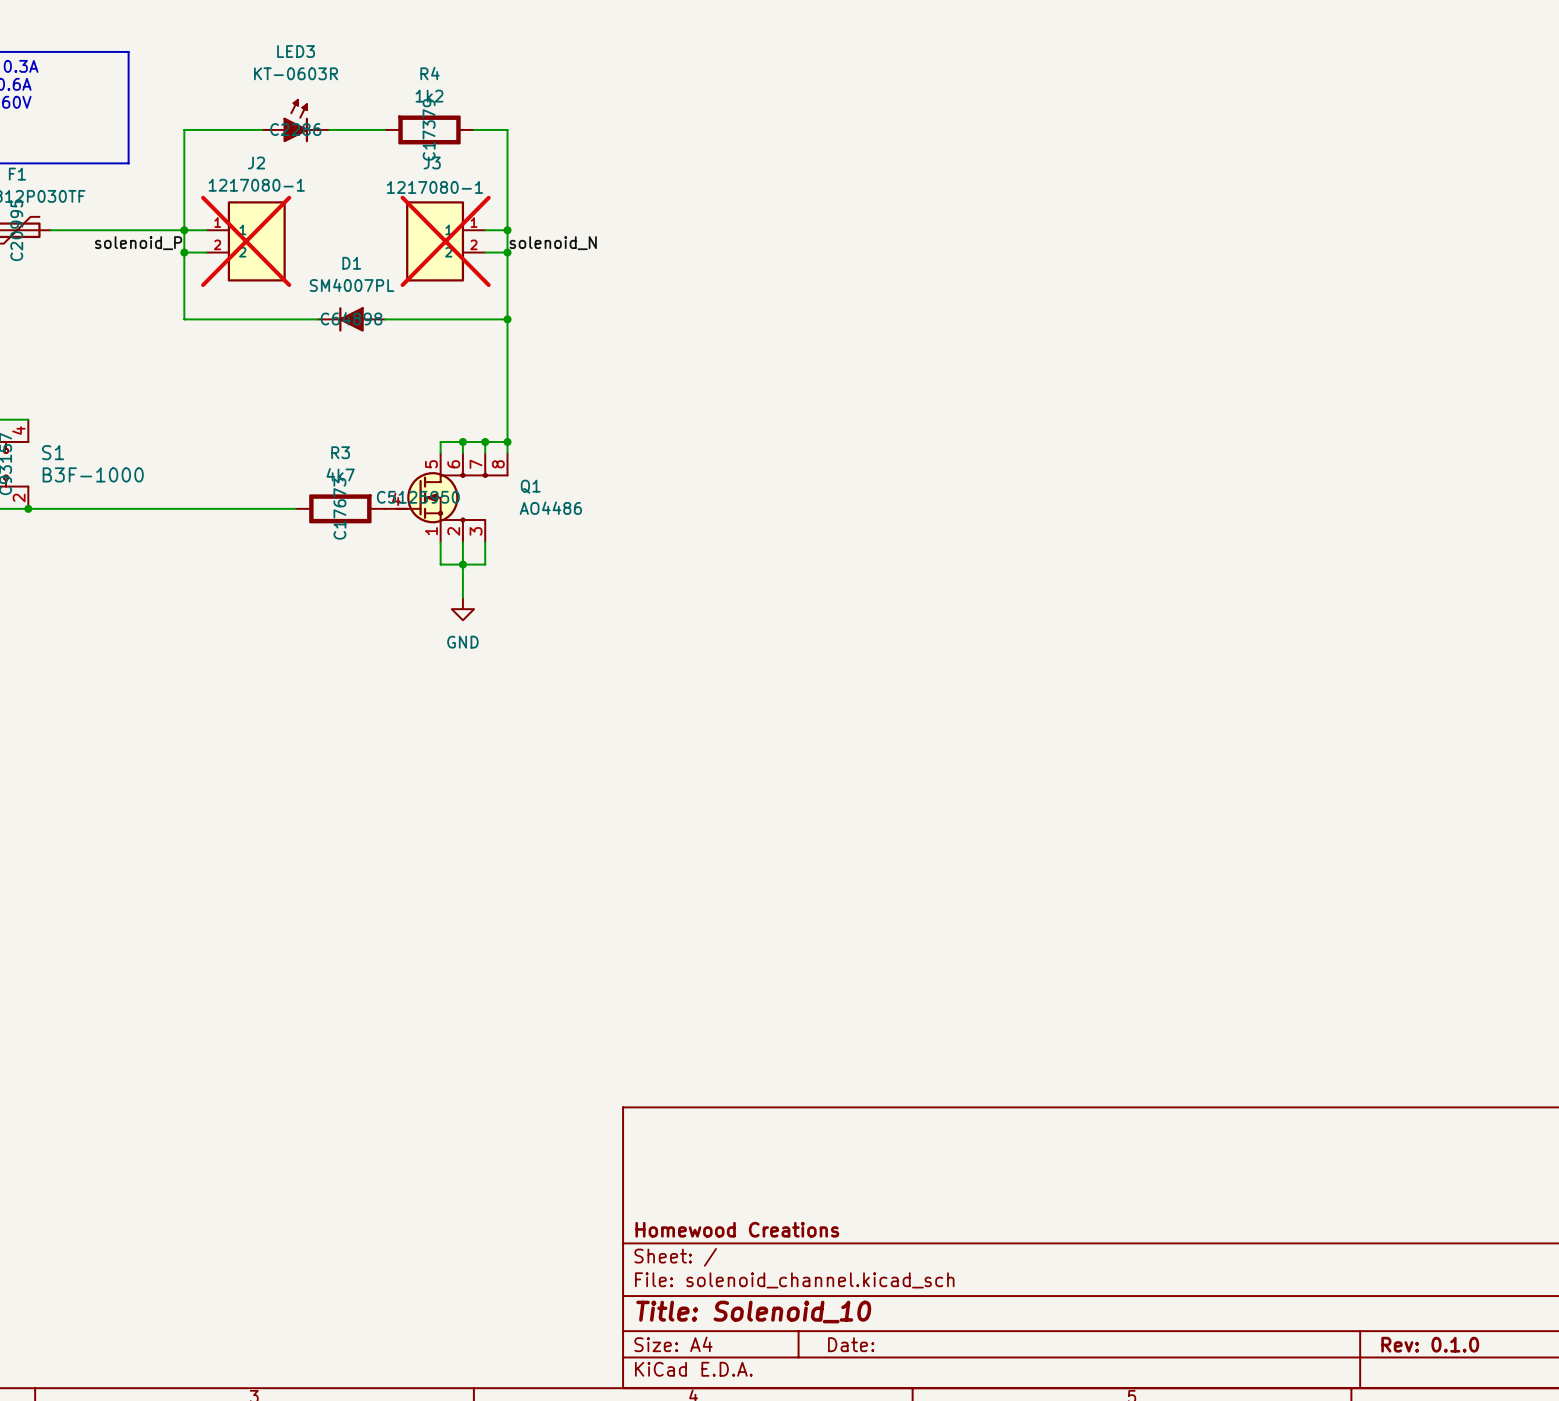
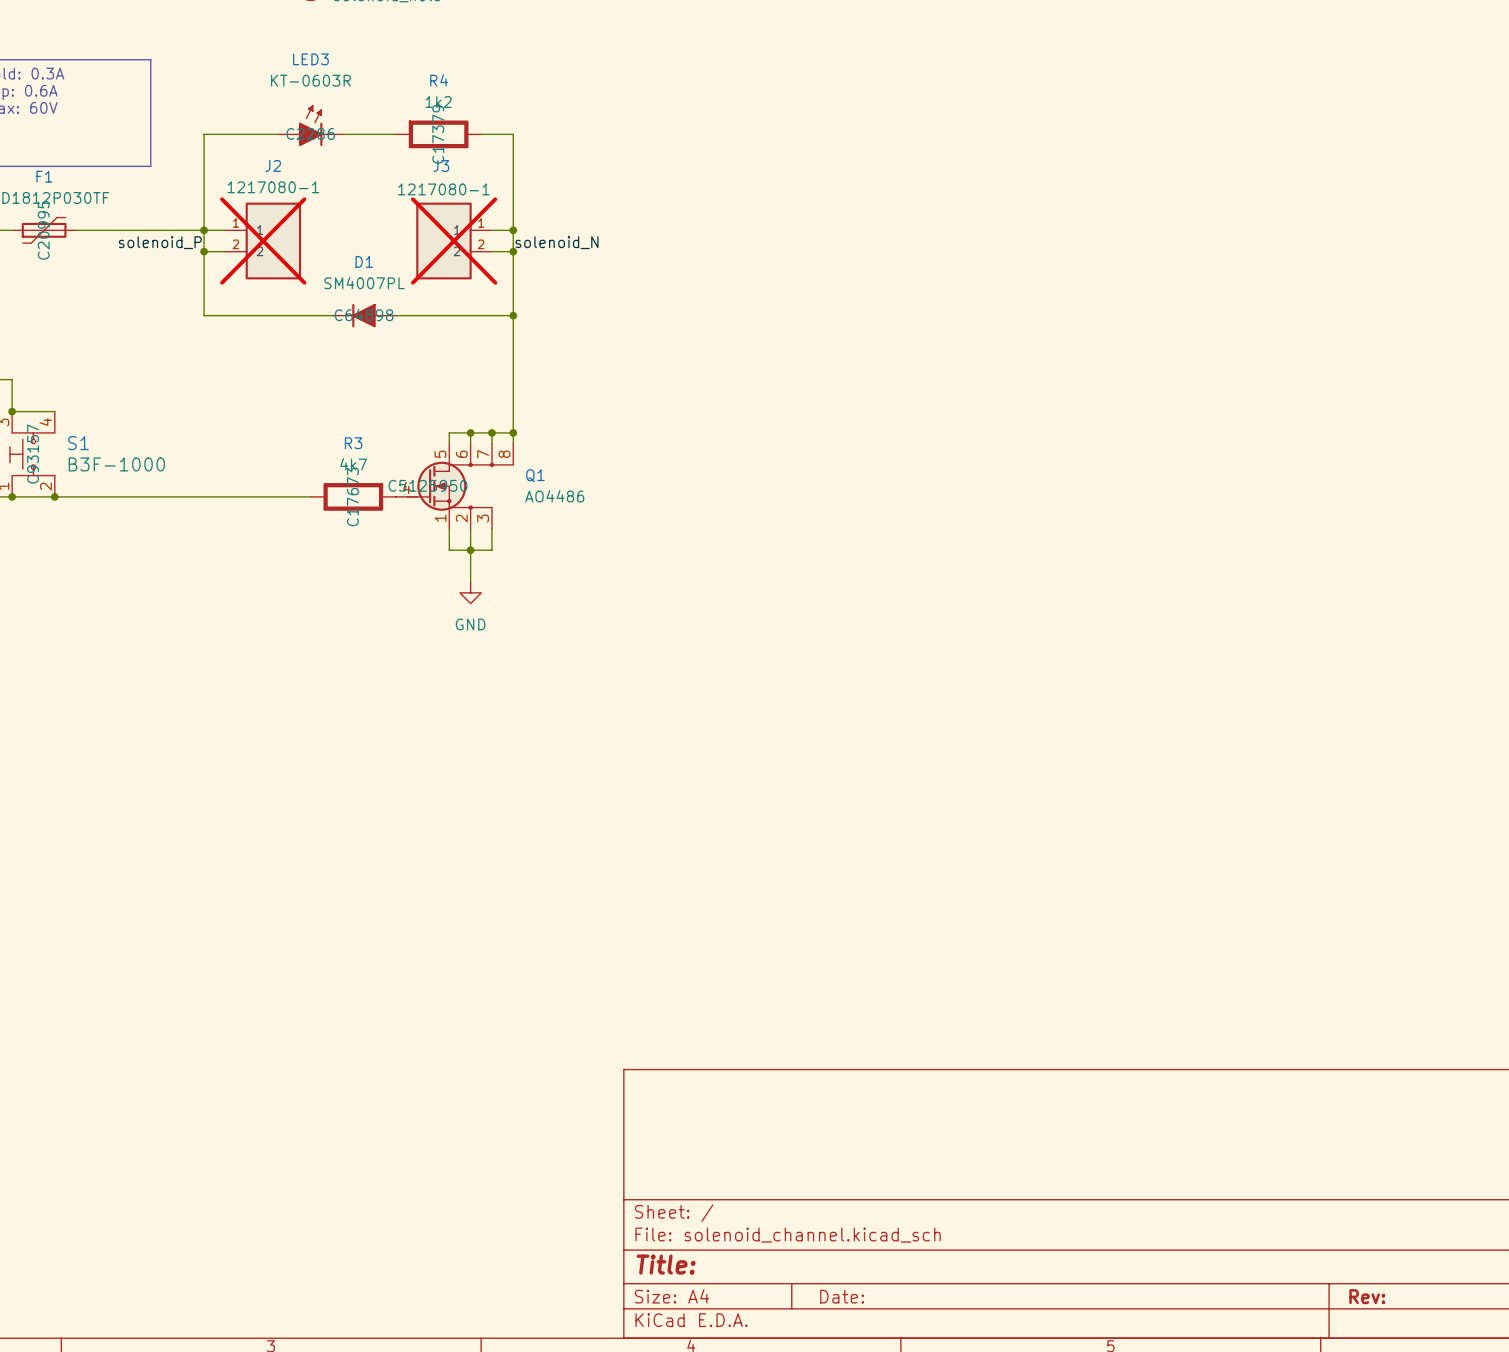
title block: Homewood Creations (737, 1229) -> none
title block: Title: Solenoid_10 (753, 1312) -> Title: (666, 1264)
title block: Rev: 0.1.0 (1430, 1344) -> Rev: (1367, 1296)

